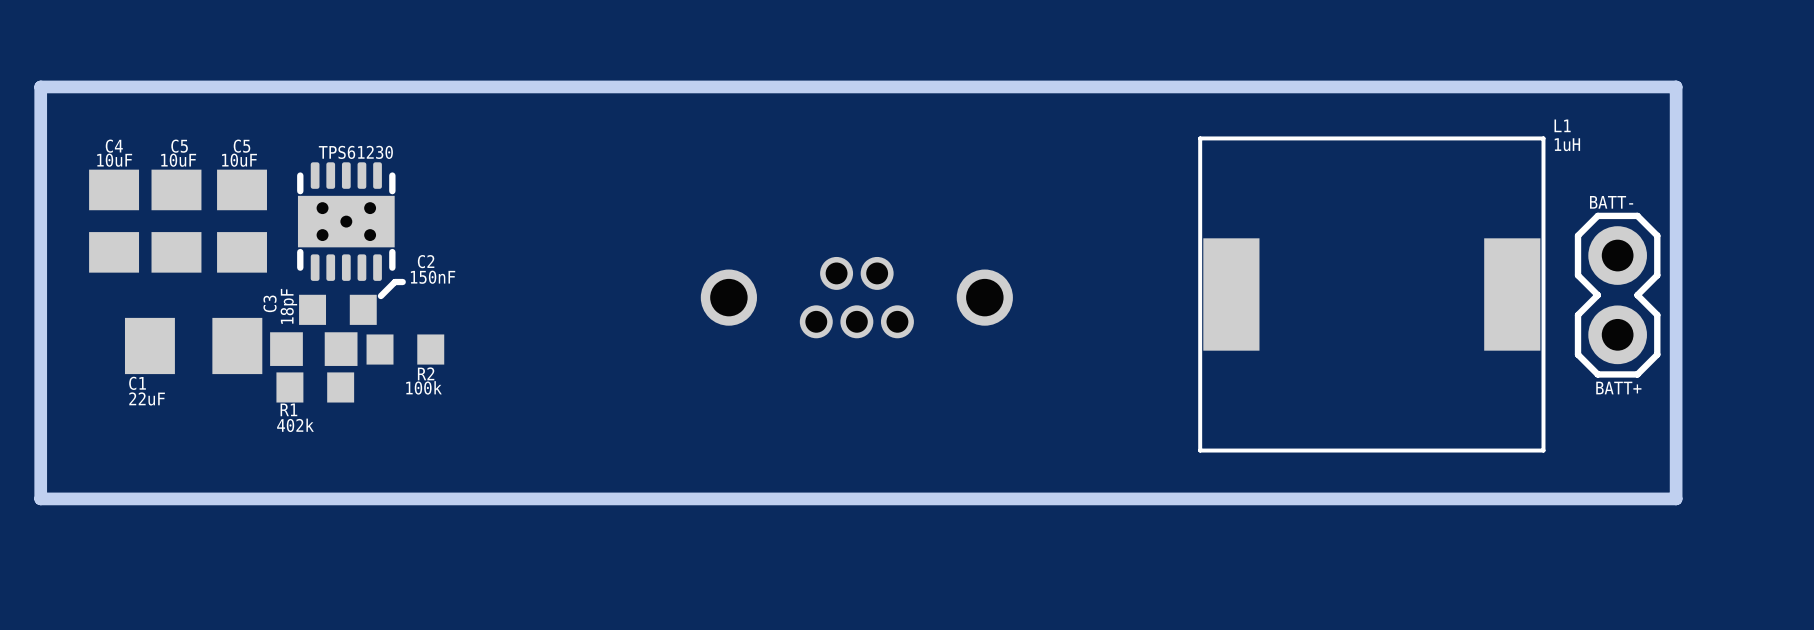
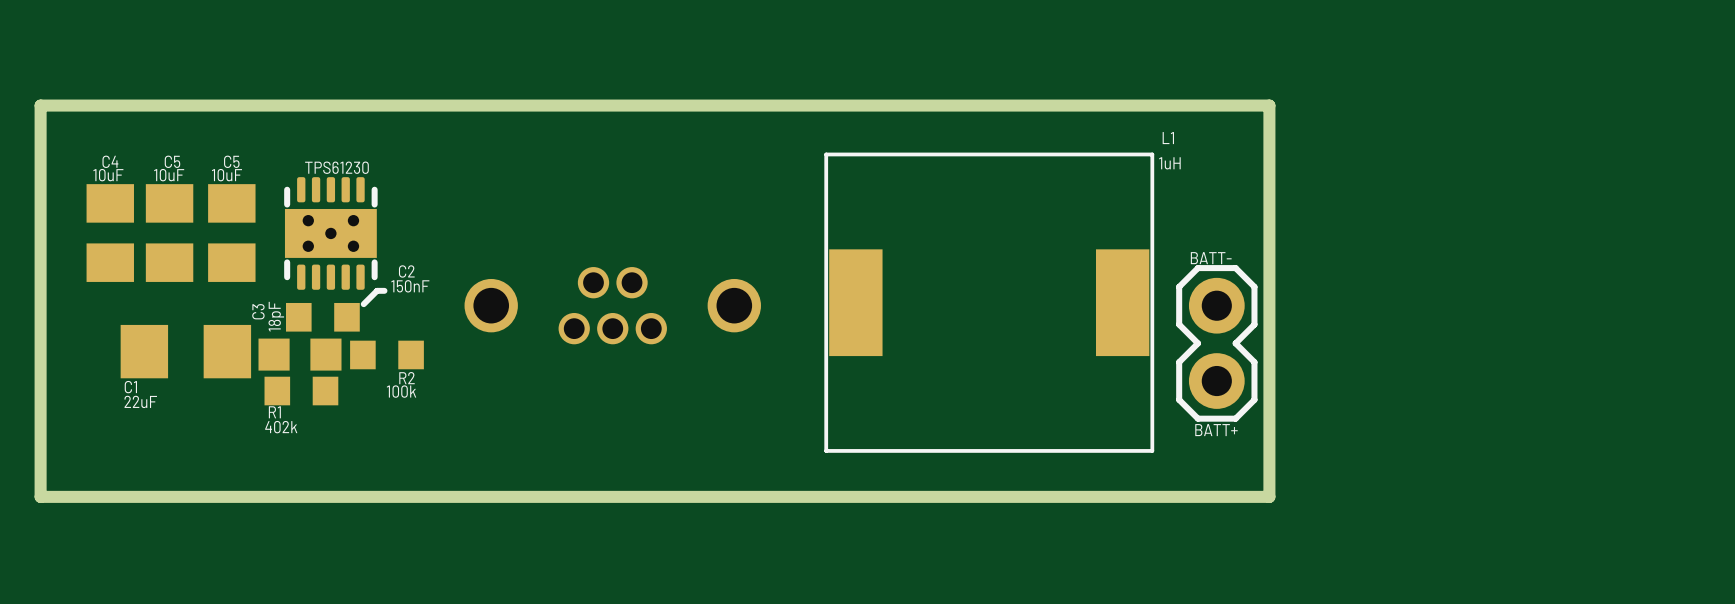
board edge: (1334, 86) (1676, 86) (1676, 498) (1334, 498) -> (1269, 105) (1269, 496)
text position: L1 (1562, 125) -> L1 (1168, 138)
text position: 1uH (1567, 144) -> 1uH (1169, 163)
text position: BATT- (1611, 202) -> BATT- (1211, 258)
part position: (1371, 294) -> (989, 302)
part position: (1617, 295) -> (1216, 343)
part position: (856, 297) -> (612, 305)
text position: BATT+ (1618, 388) -> BATT+ (1216, 430)

